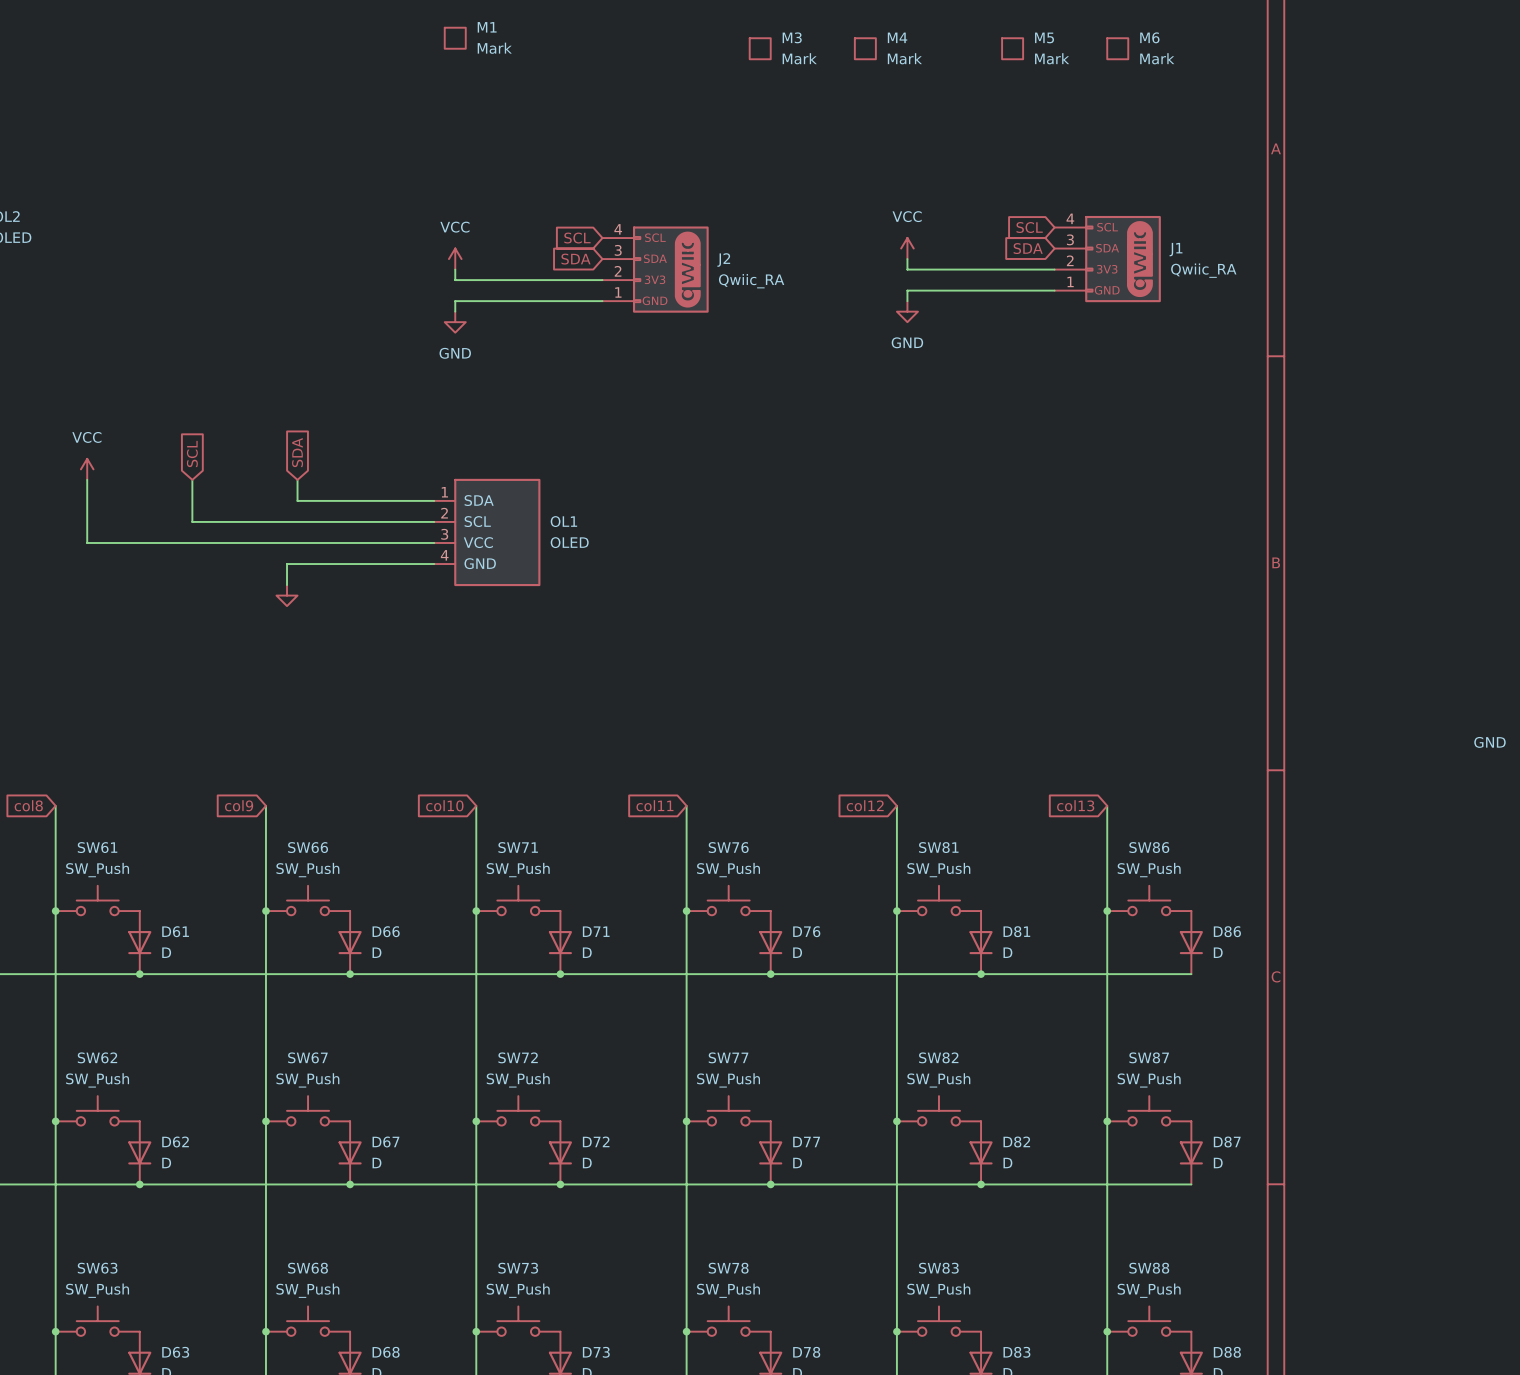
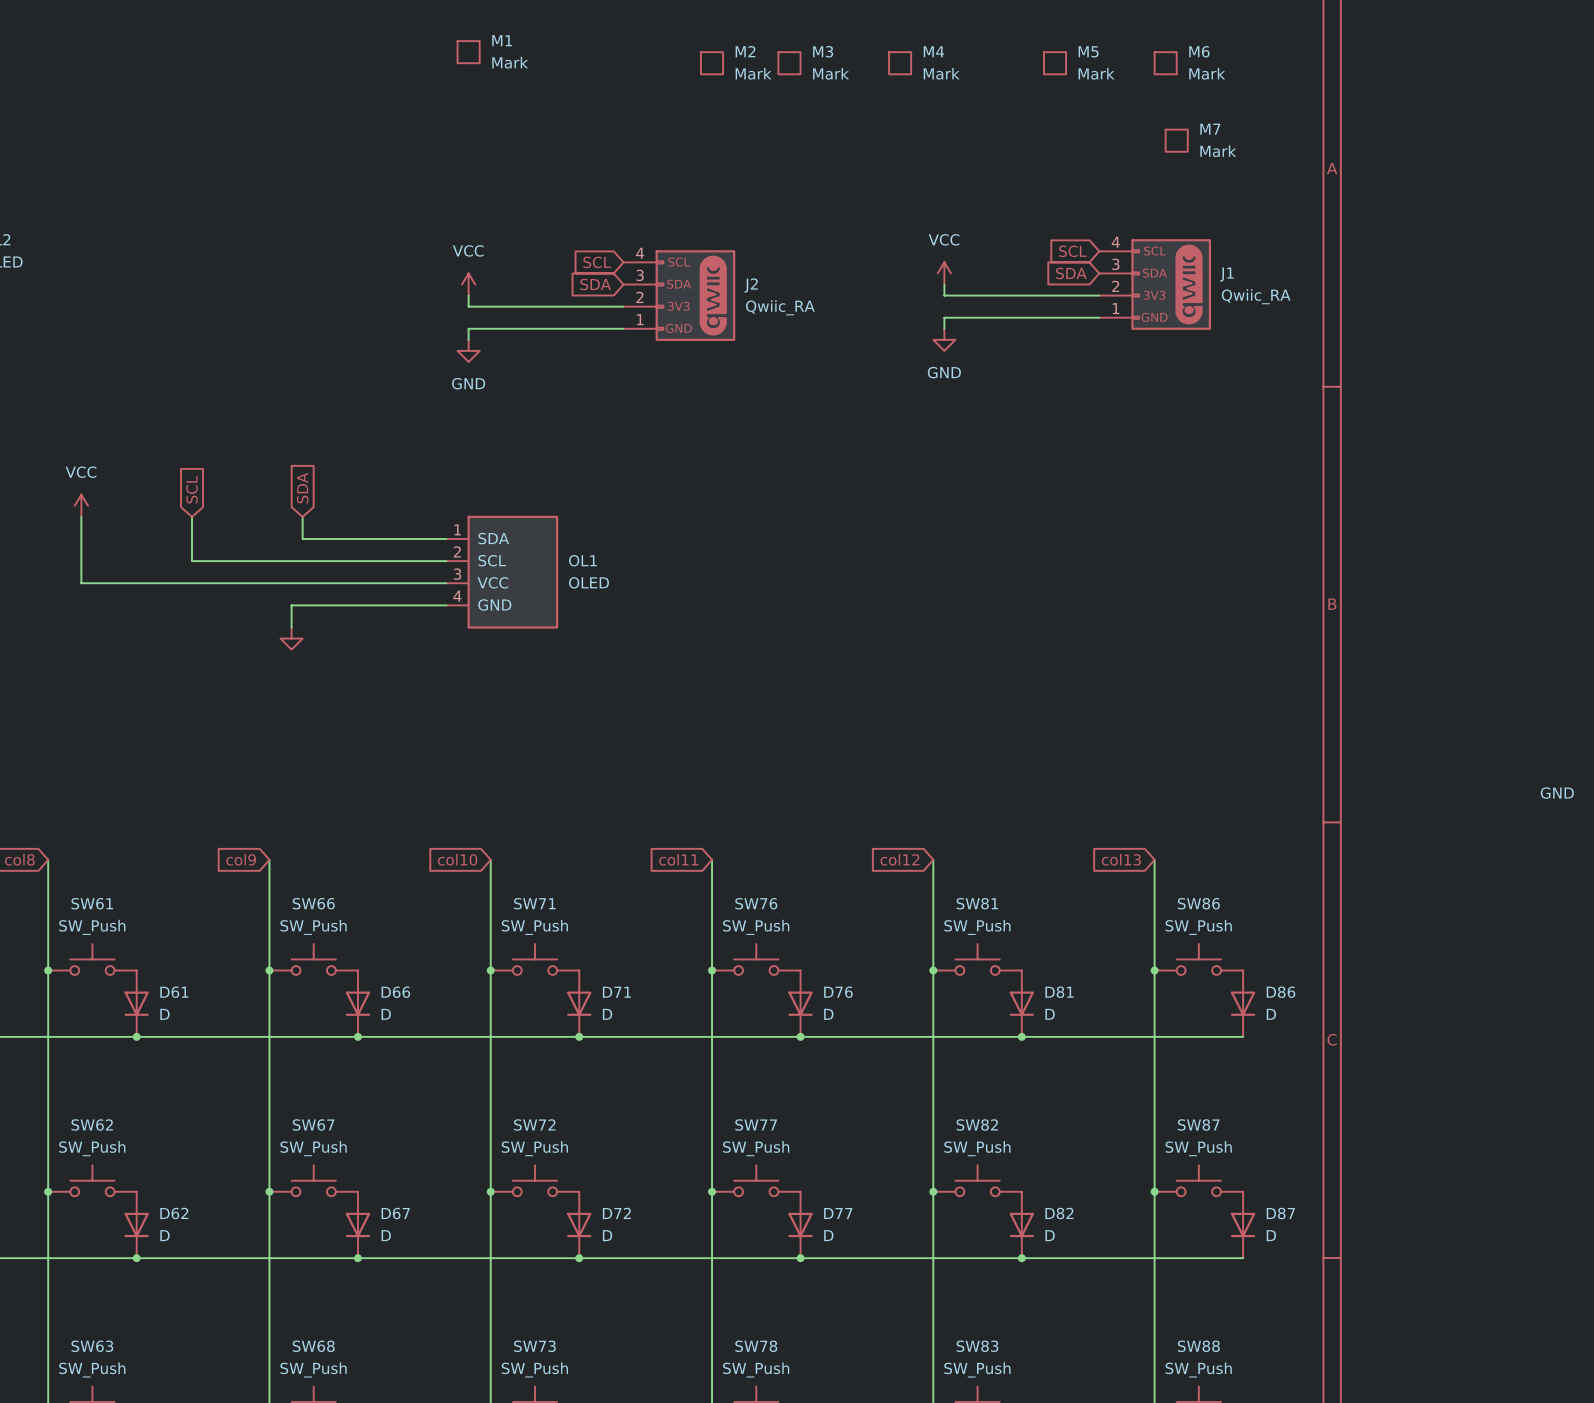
M2: none -> Mark (712, 63)
M7: none -> Mark (1176, 140)

